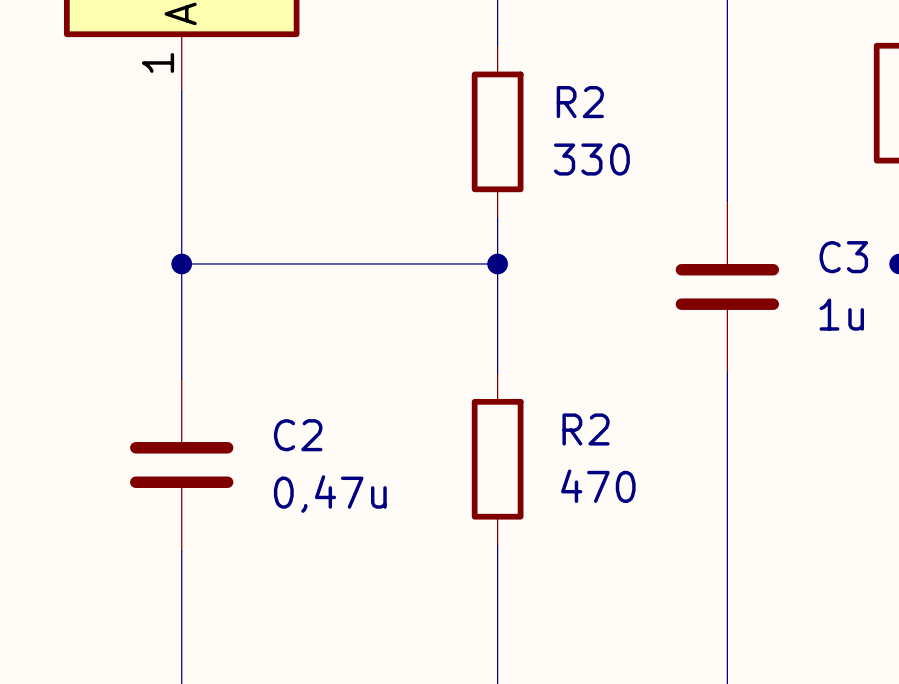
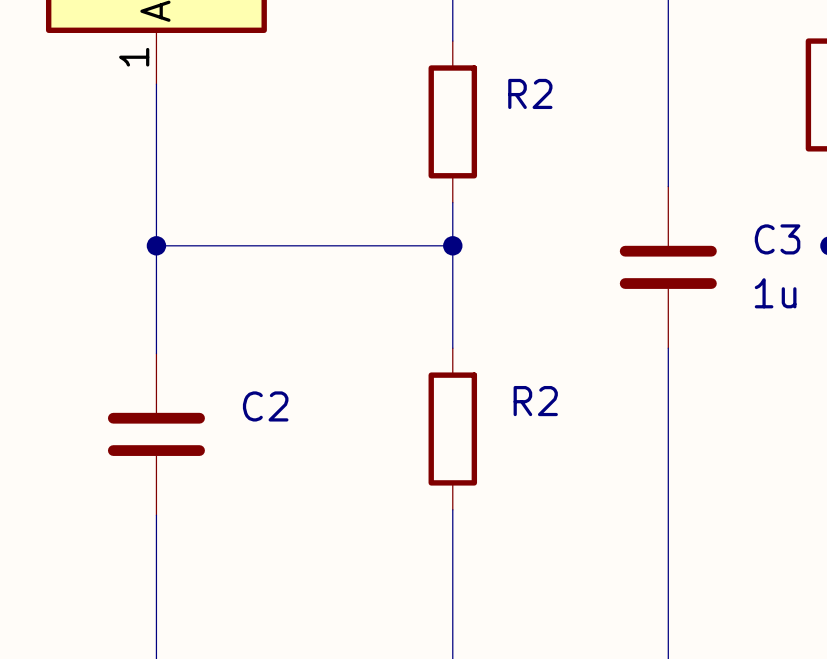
R2 value: 330 (591, 159) -> none
R2 value: 470 (598, 486) -> none
C2 value: 0,47u (330, 494) -> none

